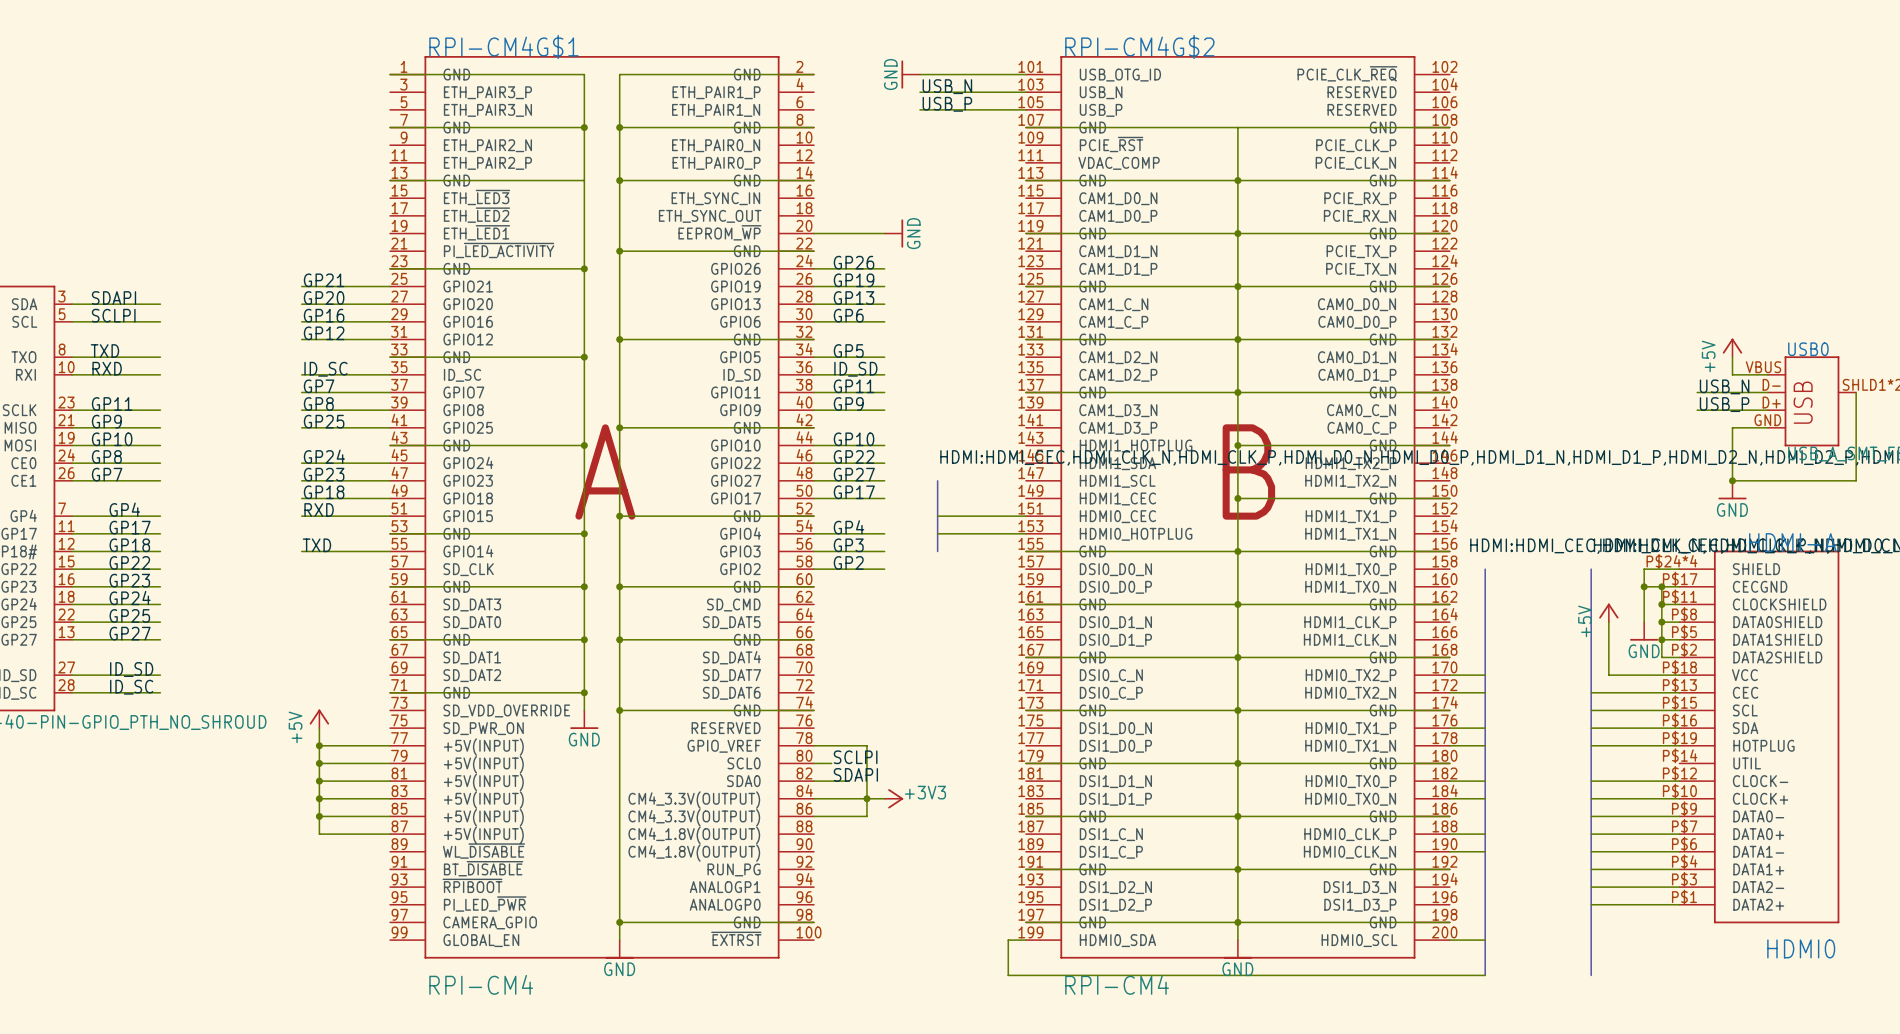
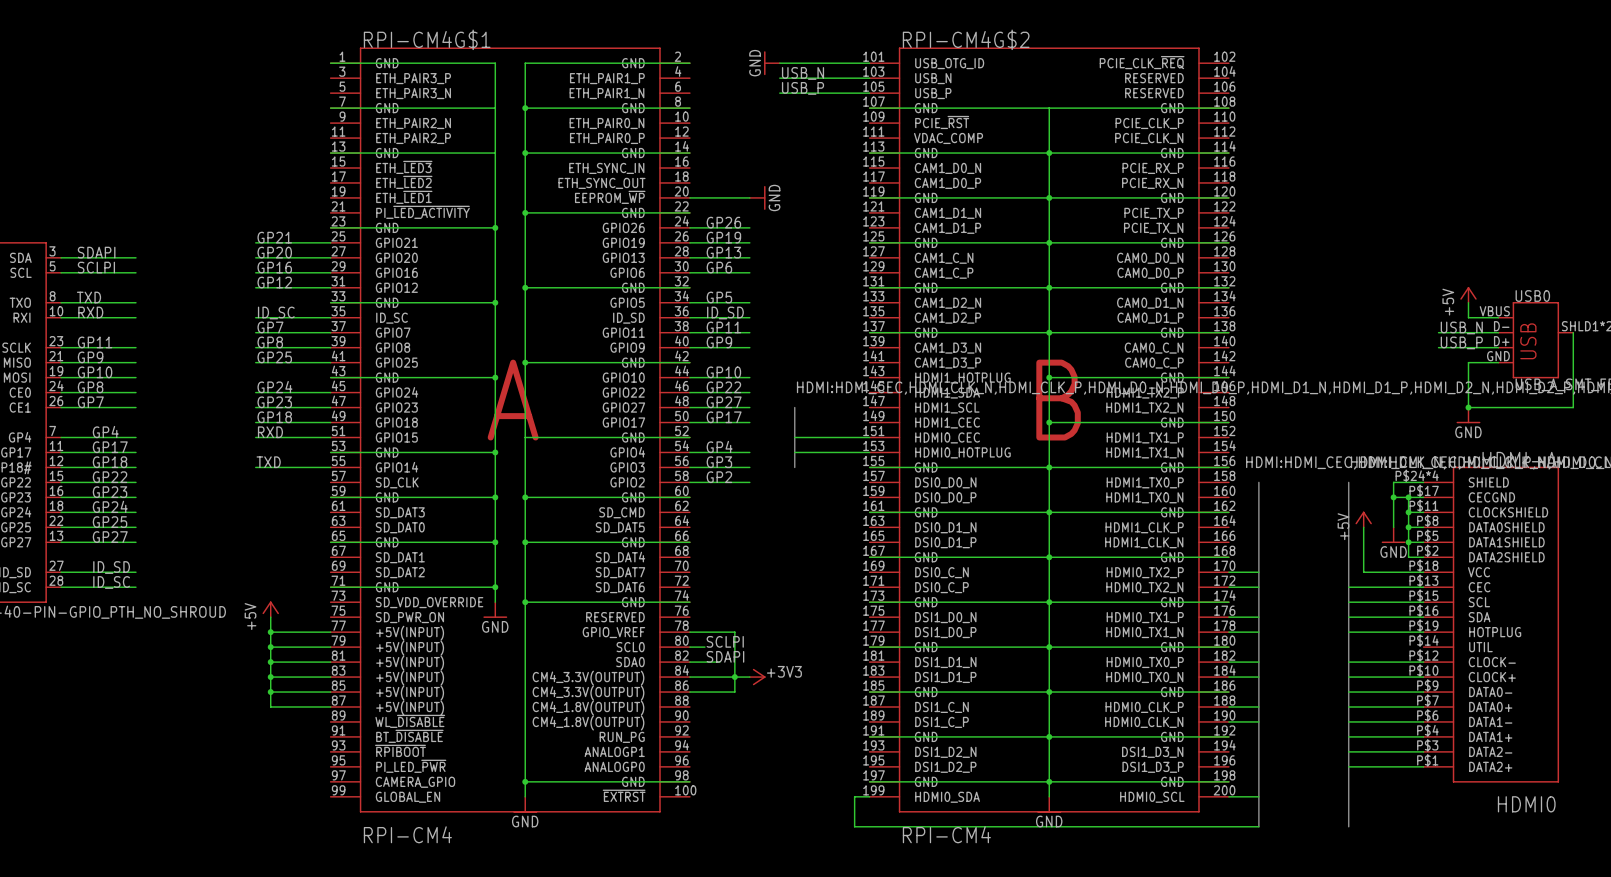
junction: (584, 127) -> none
junction: (619, 516) -> none

